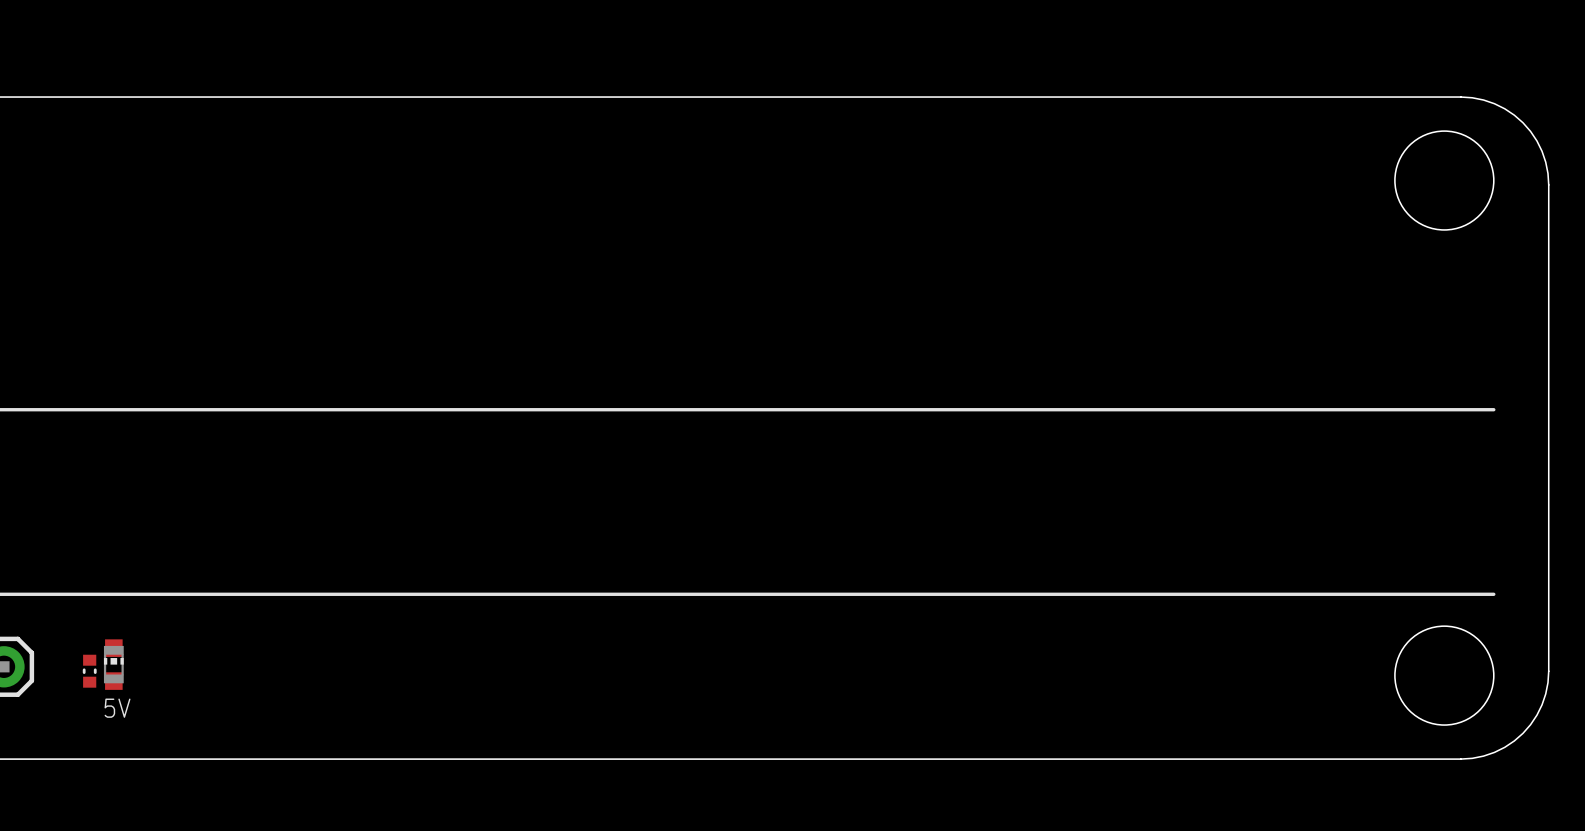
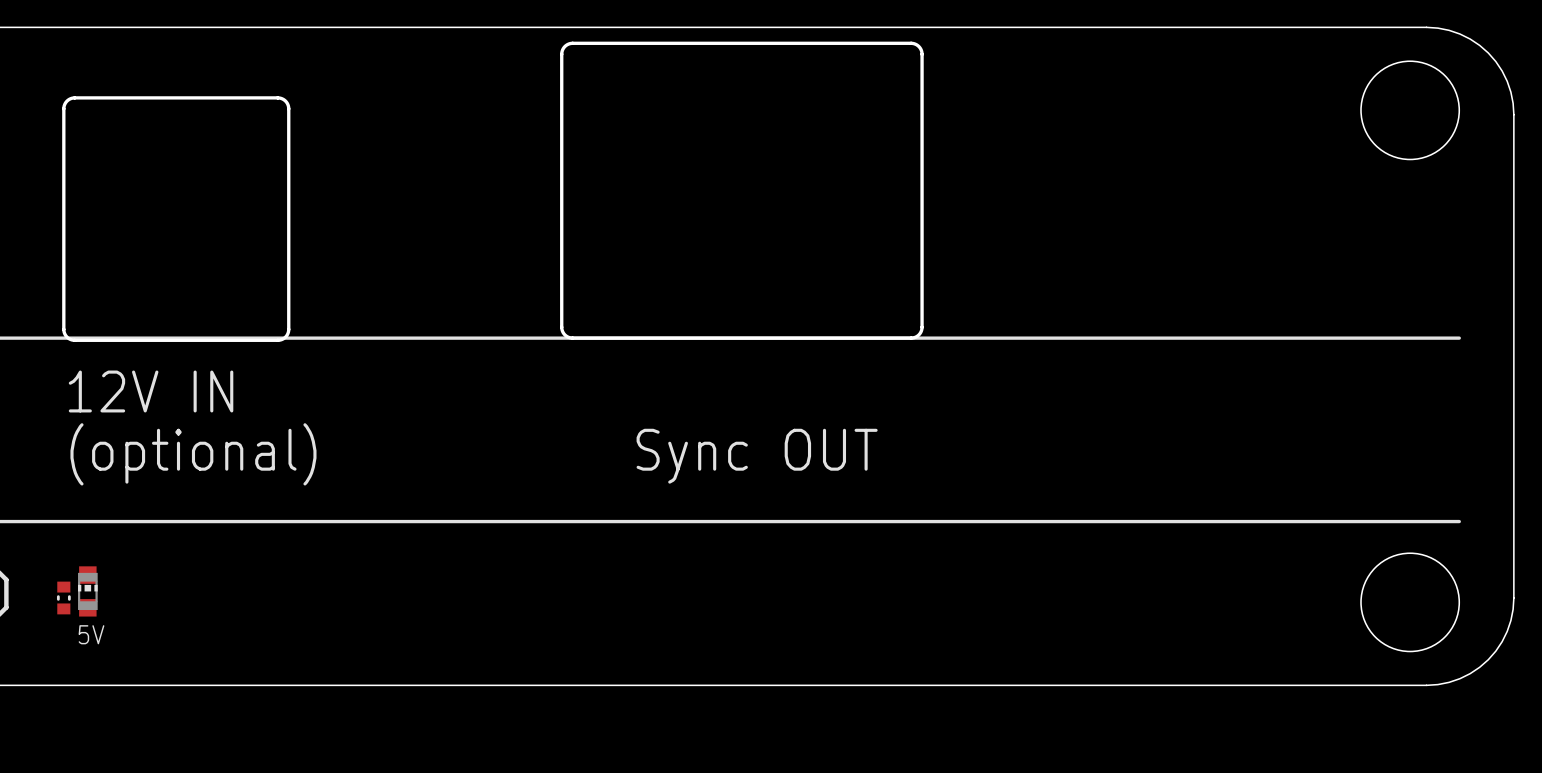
board edge: none -> (572, 43) (911, 43) (917, 45) (922, 54) (922, 327) (919, 333) (911, 338) (572, 338) (566, 335) (561, 327) (561, 54) (564, 46) (572, 43)
board edge: none -> (74, 97) (277, 97) (285, 101) (288, 108) (288, 329) (285, 337) (277, 340) (74, 340) (67, 337) (63, 329) (63, 108) (67, 101) (74, 97)
text: none -> 12V IN (151, 391)
text: none -> (optional) (193, 454)
text: none -> Sync OUT (757, 456)

